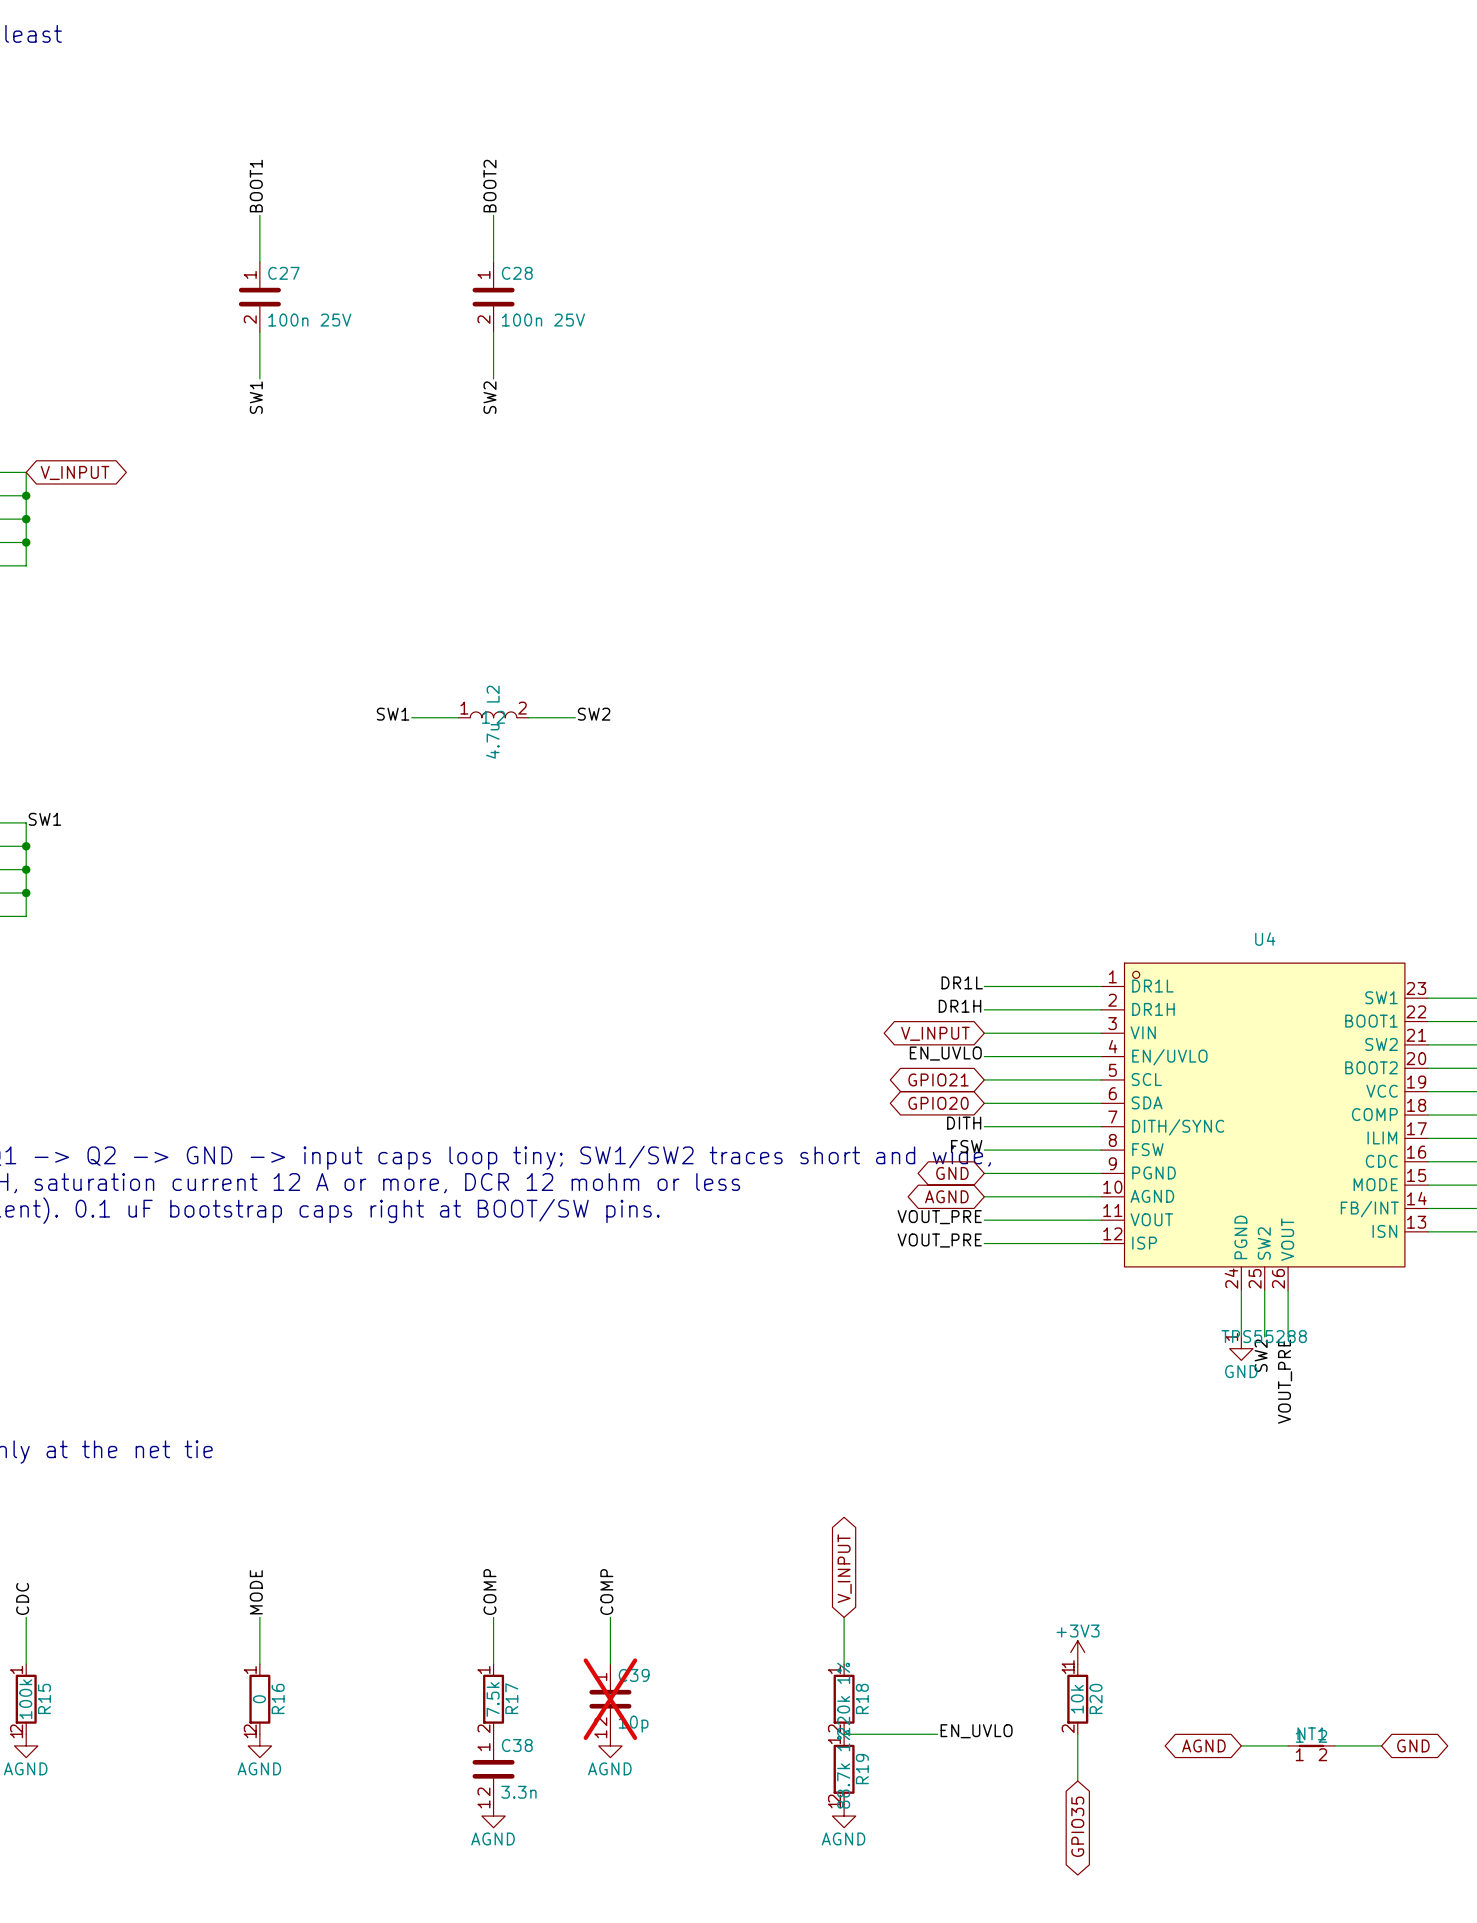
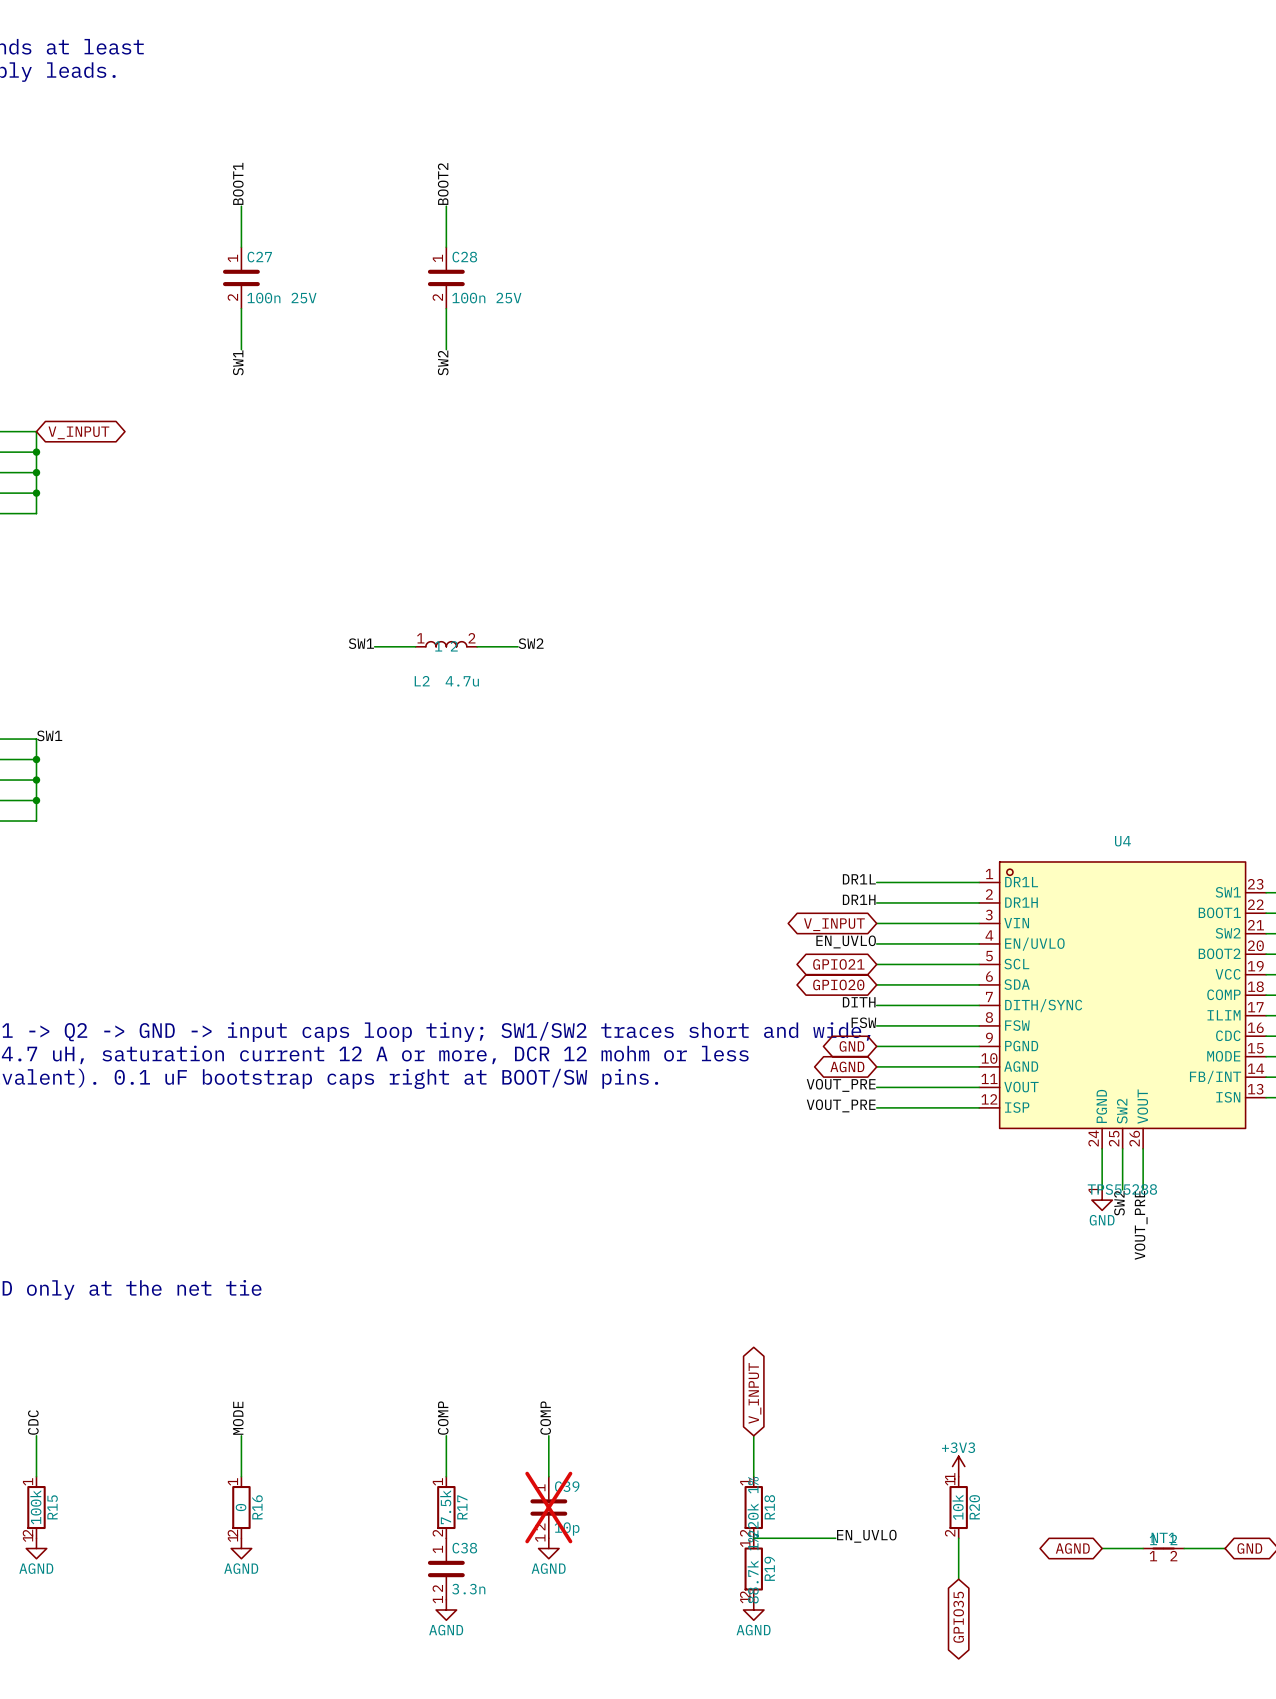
L2 name rotation: 0° (493, 694) -> 90° clockwise (422, 681)
L2 name position: L2 (493, 694) -> L2 (422, 681)
L2 value rotation: 0° (492, 741) -> 90° clockwise (462, 681)

